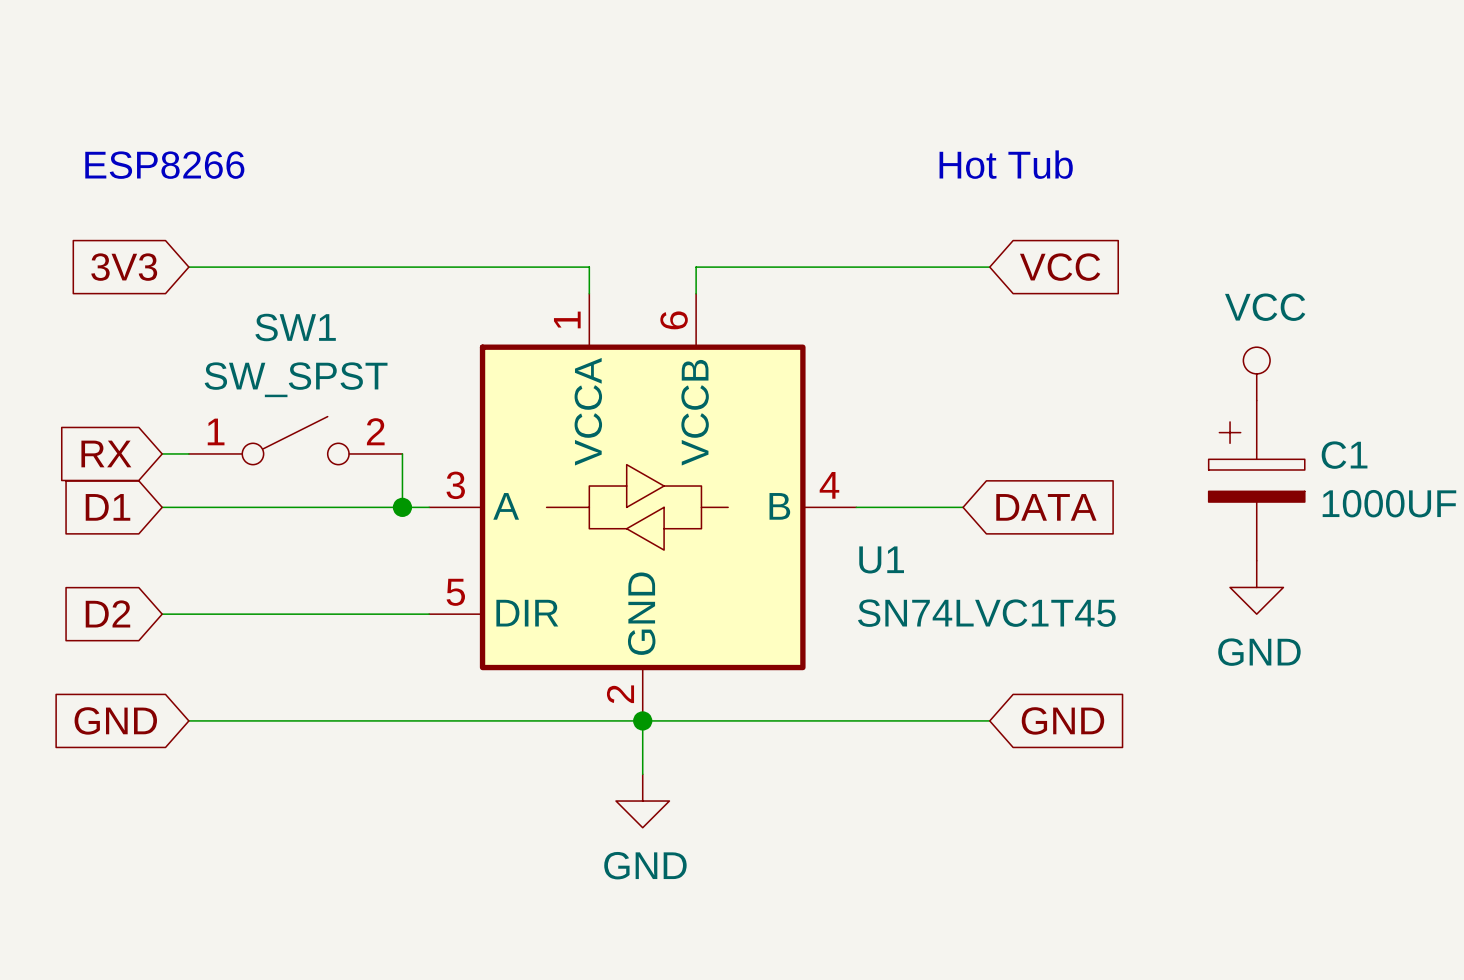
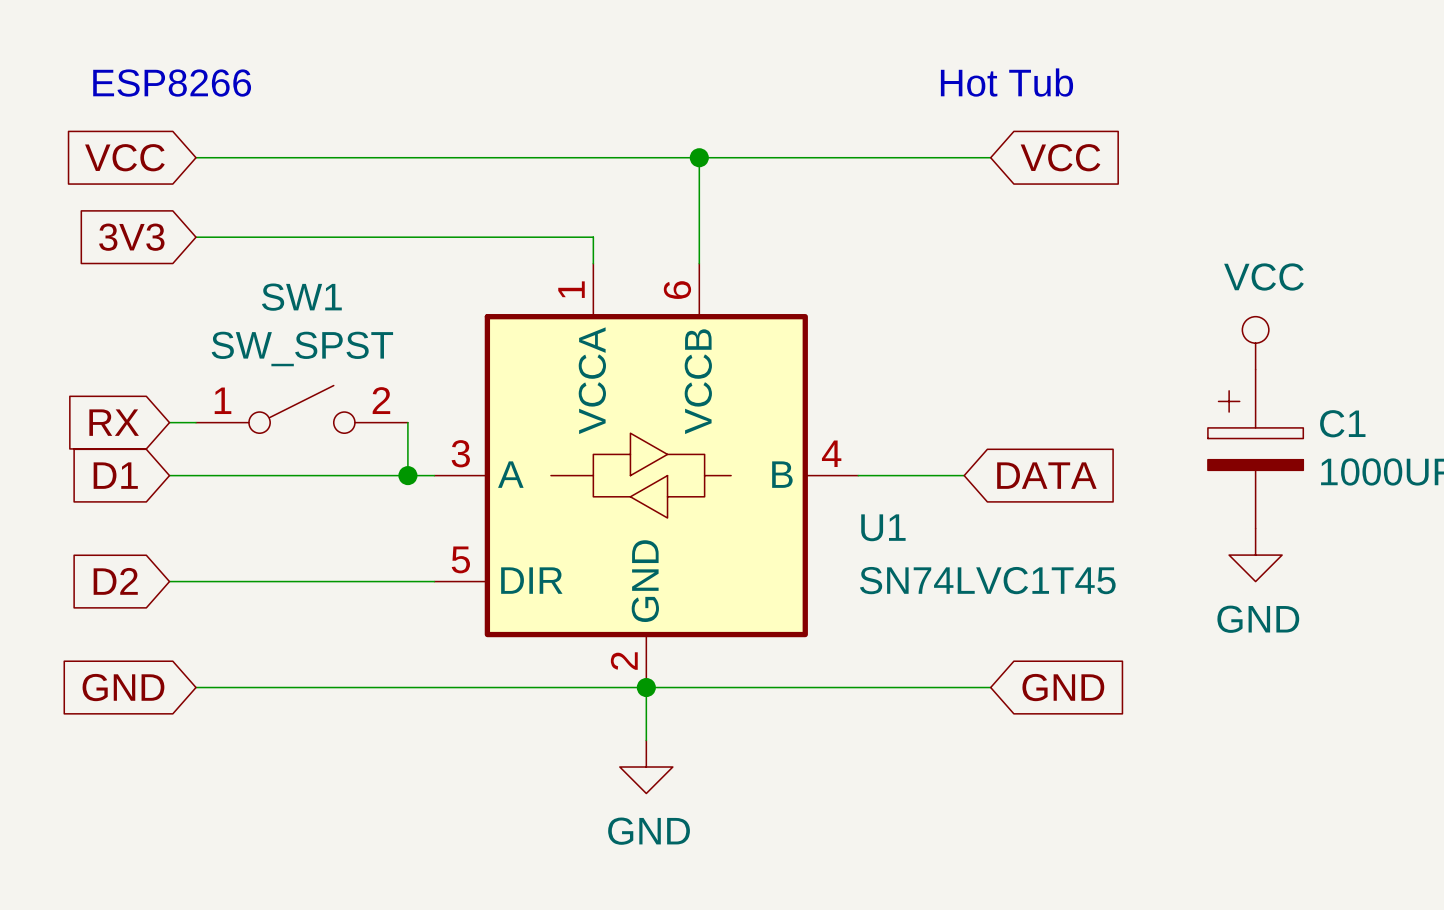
text position: Hot Tub (1006, 164) -> Hot Tub (1006, 82)
text position: ESP8266 (164, 165) -> ESP8266 (172, 83)
global label: none -> VCC (124, 157)
wire: none -> (196, 157) (990, 157)
junction: none -> (699, 157)
wire: (696, 267) (989, 267) -> (699, 237) (699, 157)
global label position: VCC (1060, 267) -> VCC (1060, 157)

